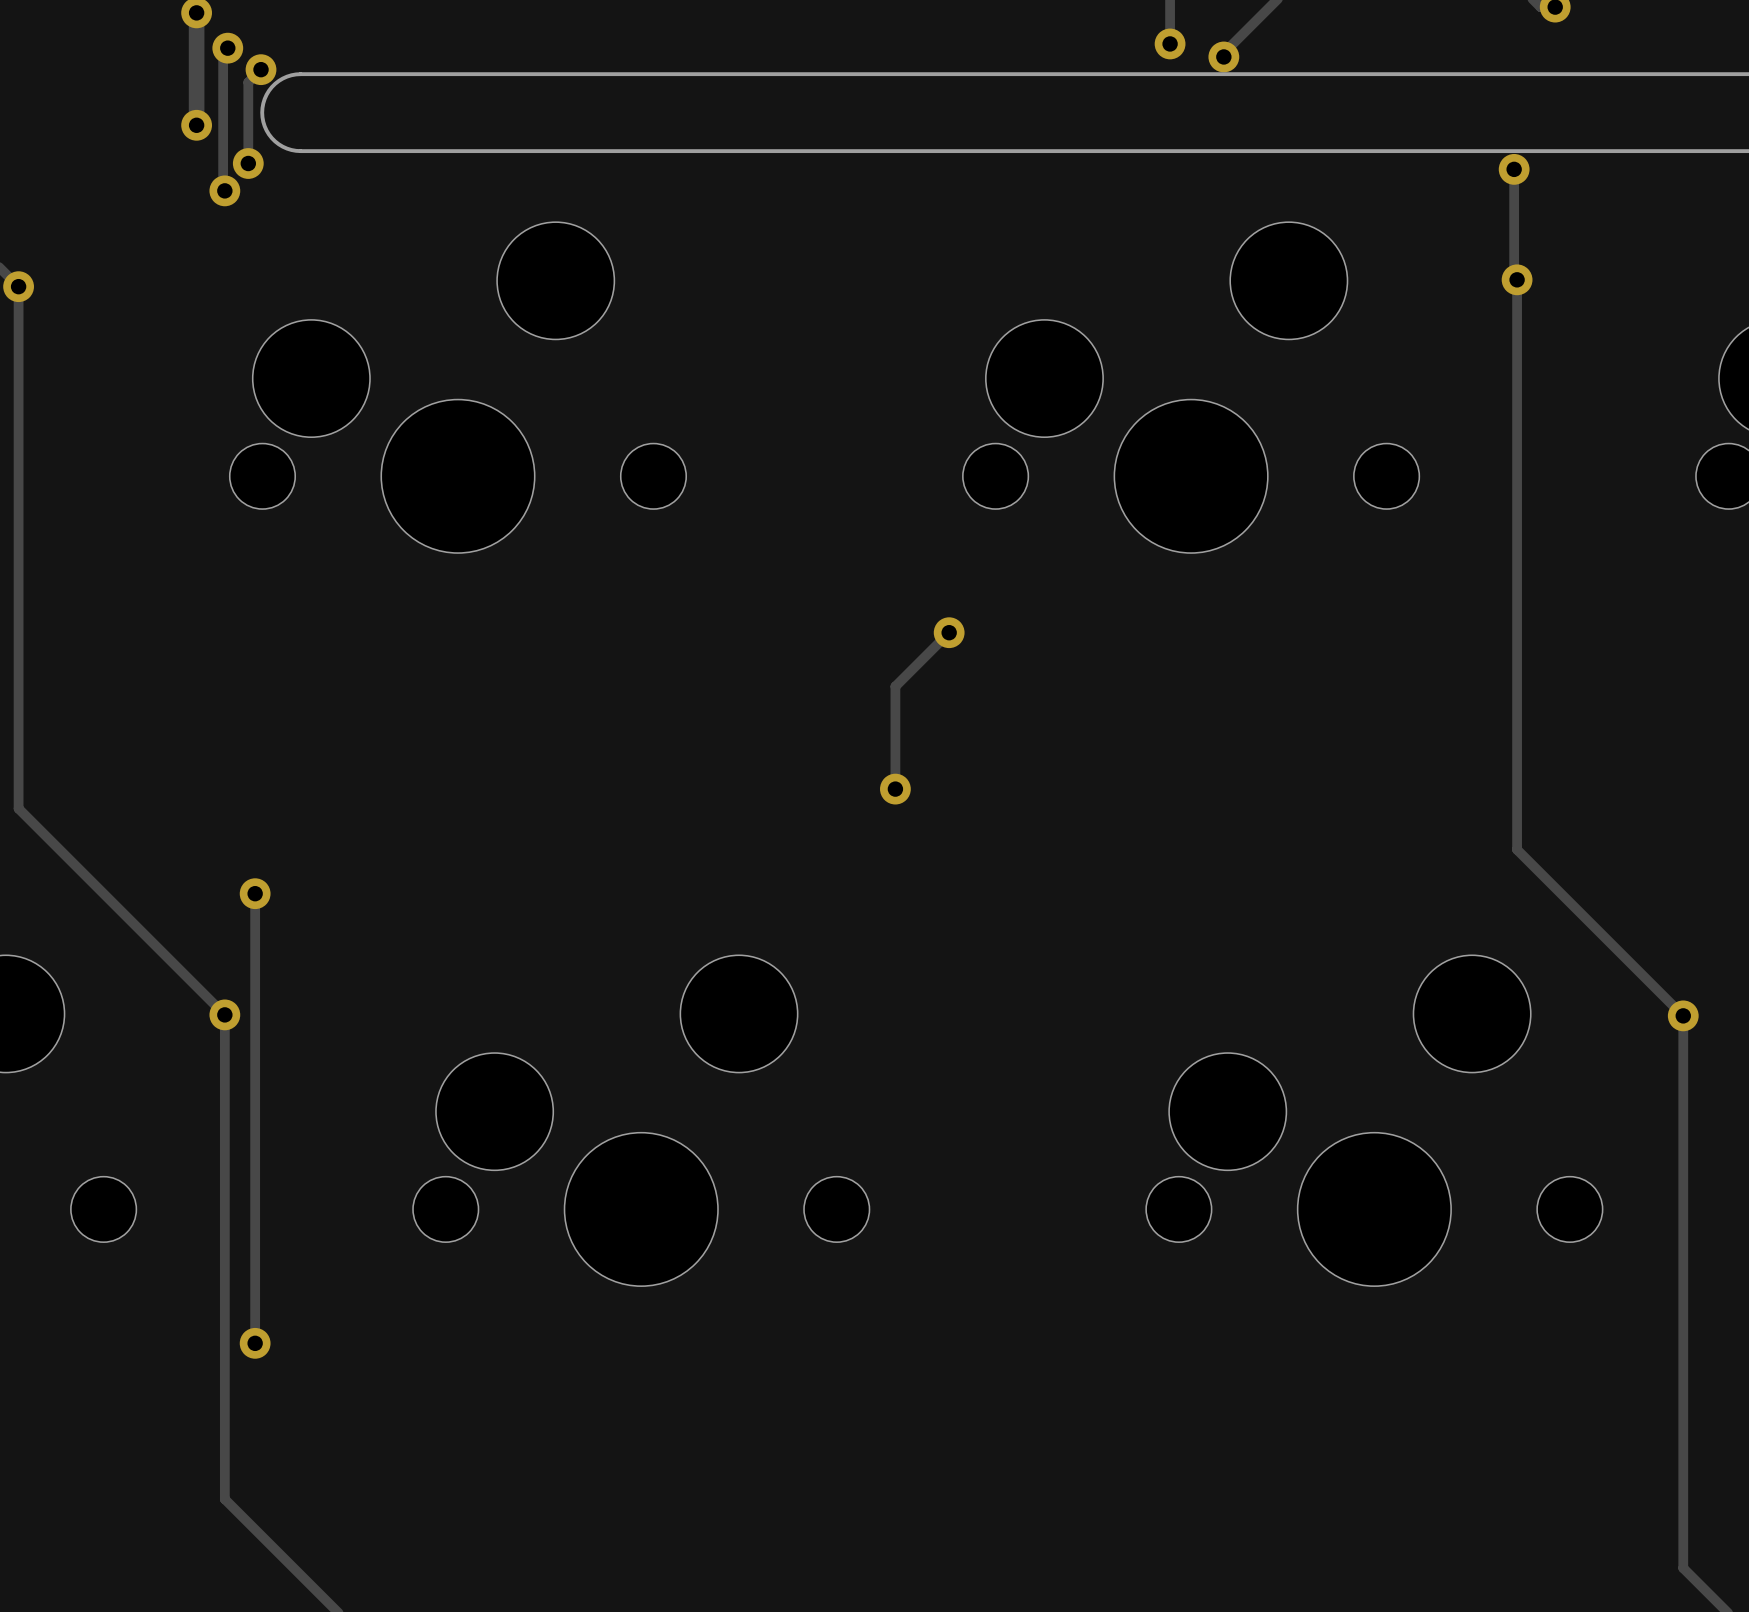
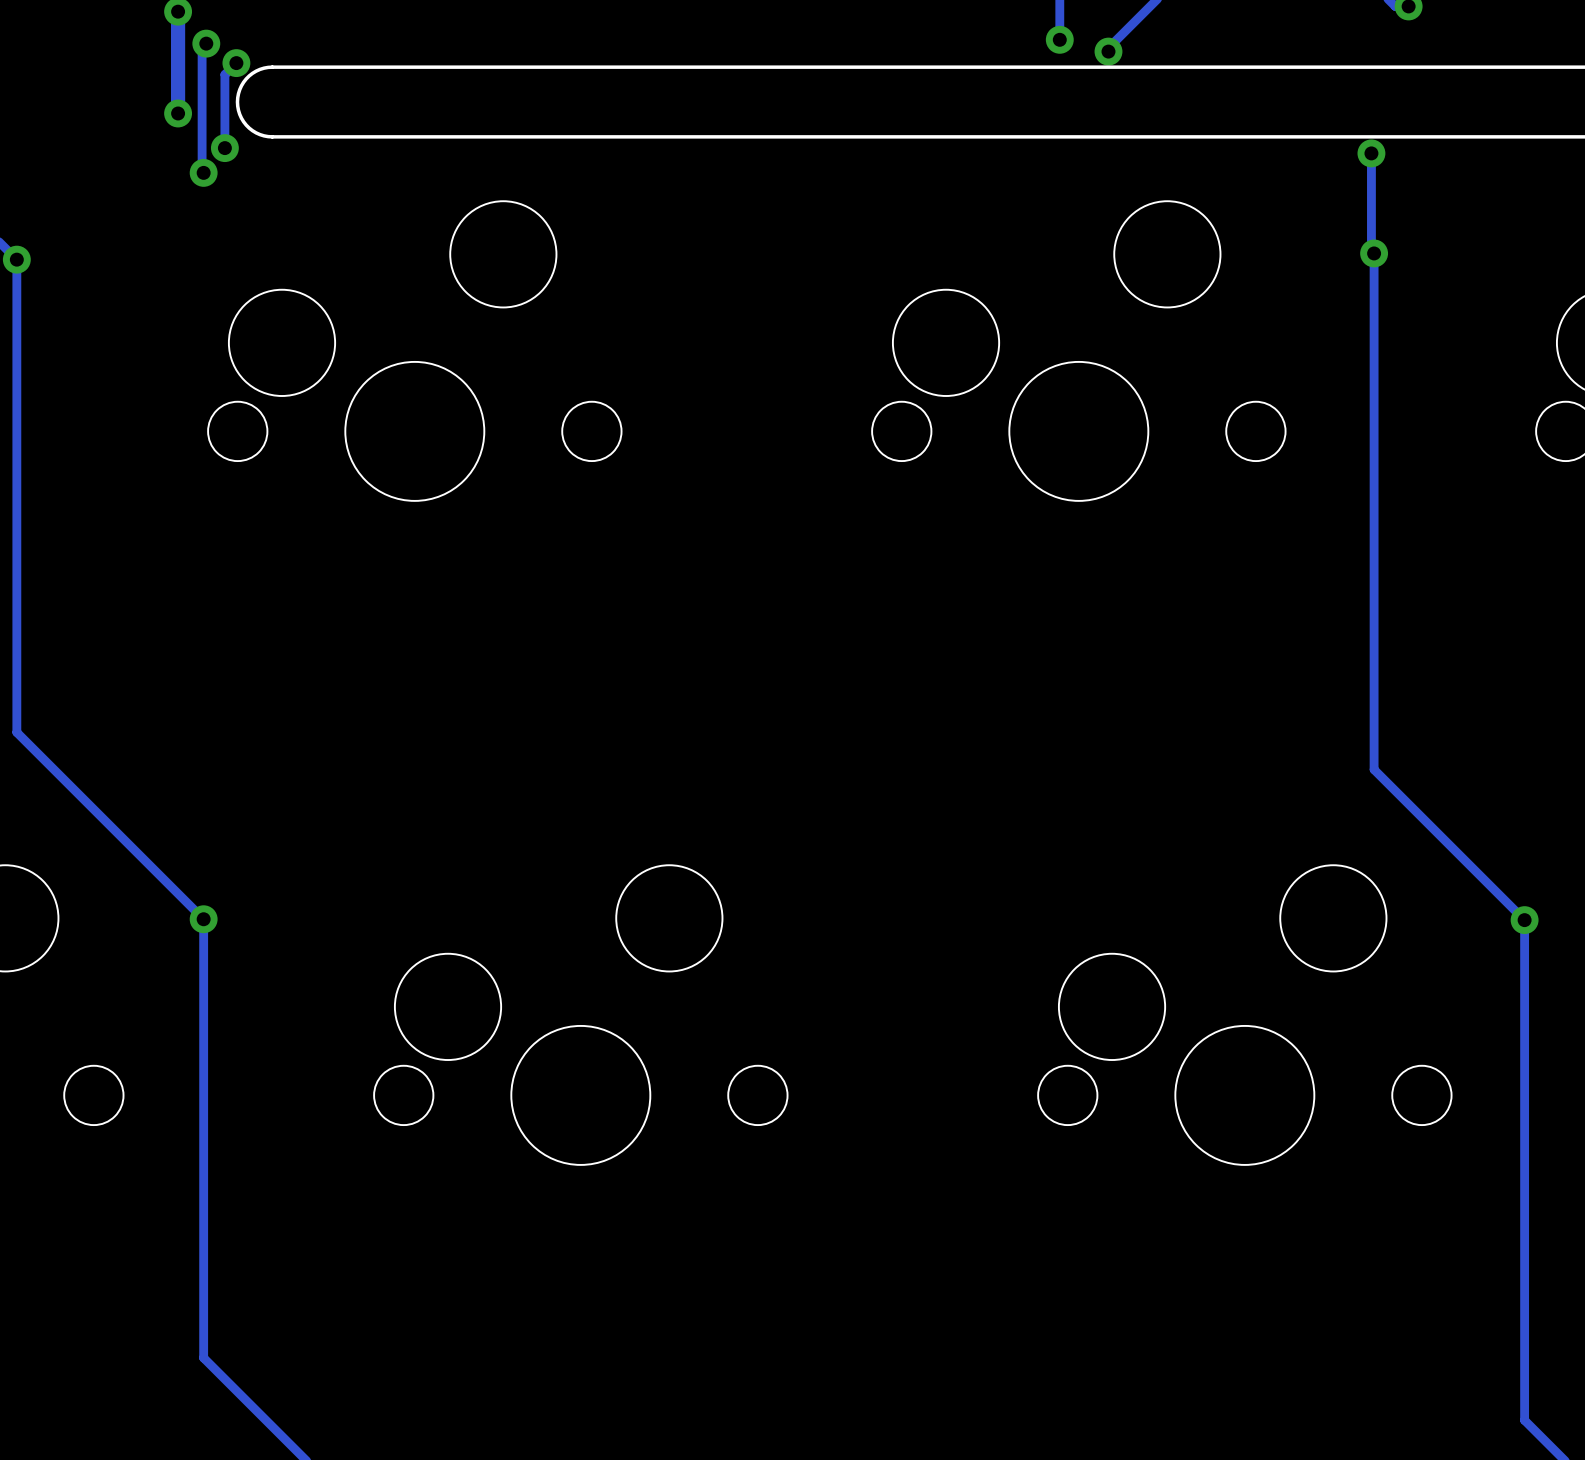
track: (949, 632) (895, 686) (895, 789) -> none
via: (949, 632) -> none
via: (895, 789) -> none
track: (255, 893) (255, 1343) -> none
via: (255, 893) -> none
via: (255, 1343) -> none

